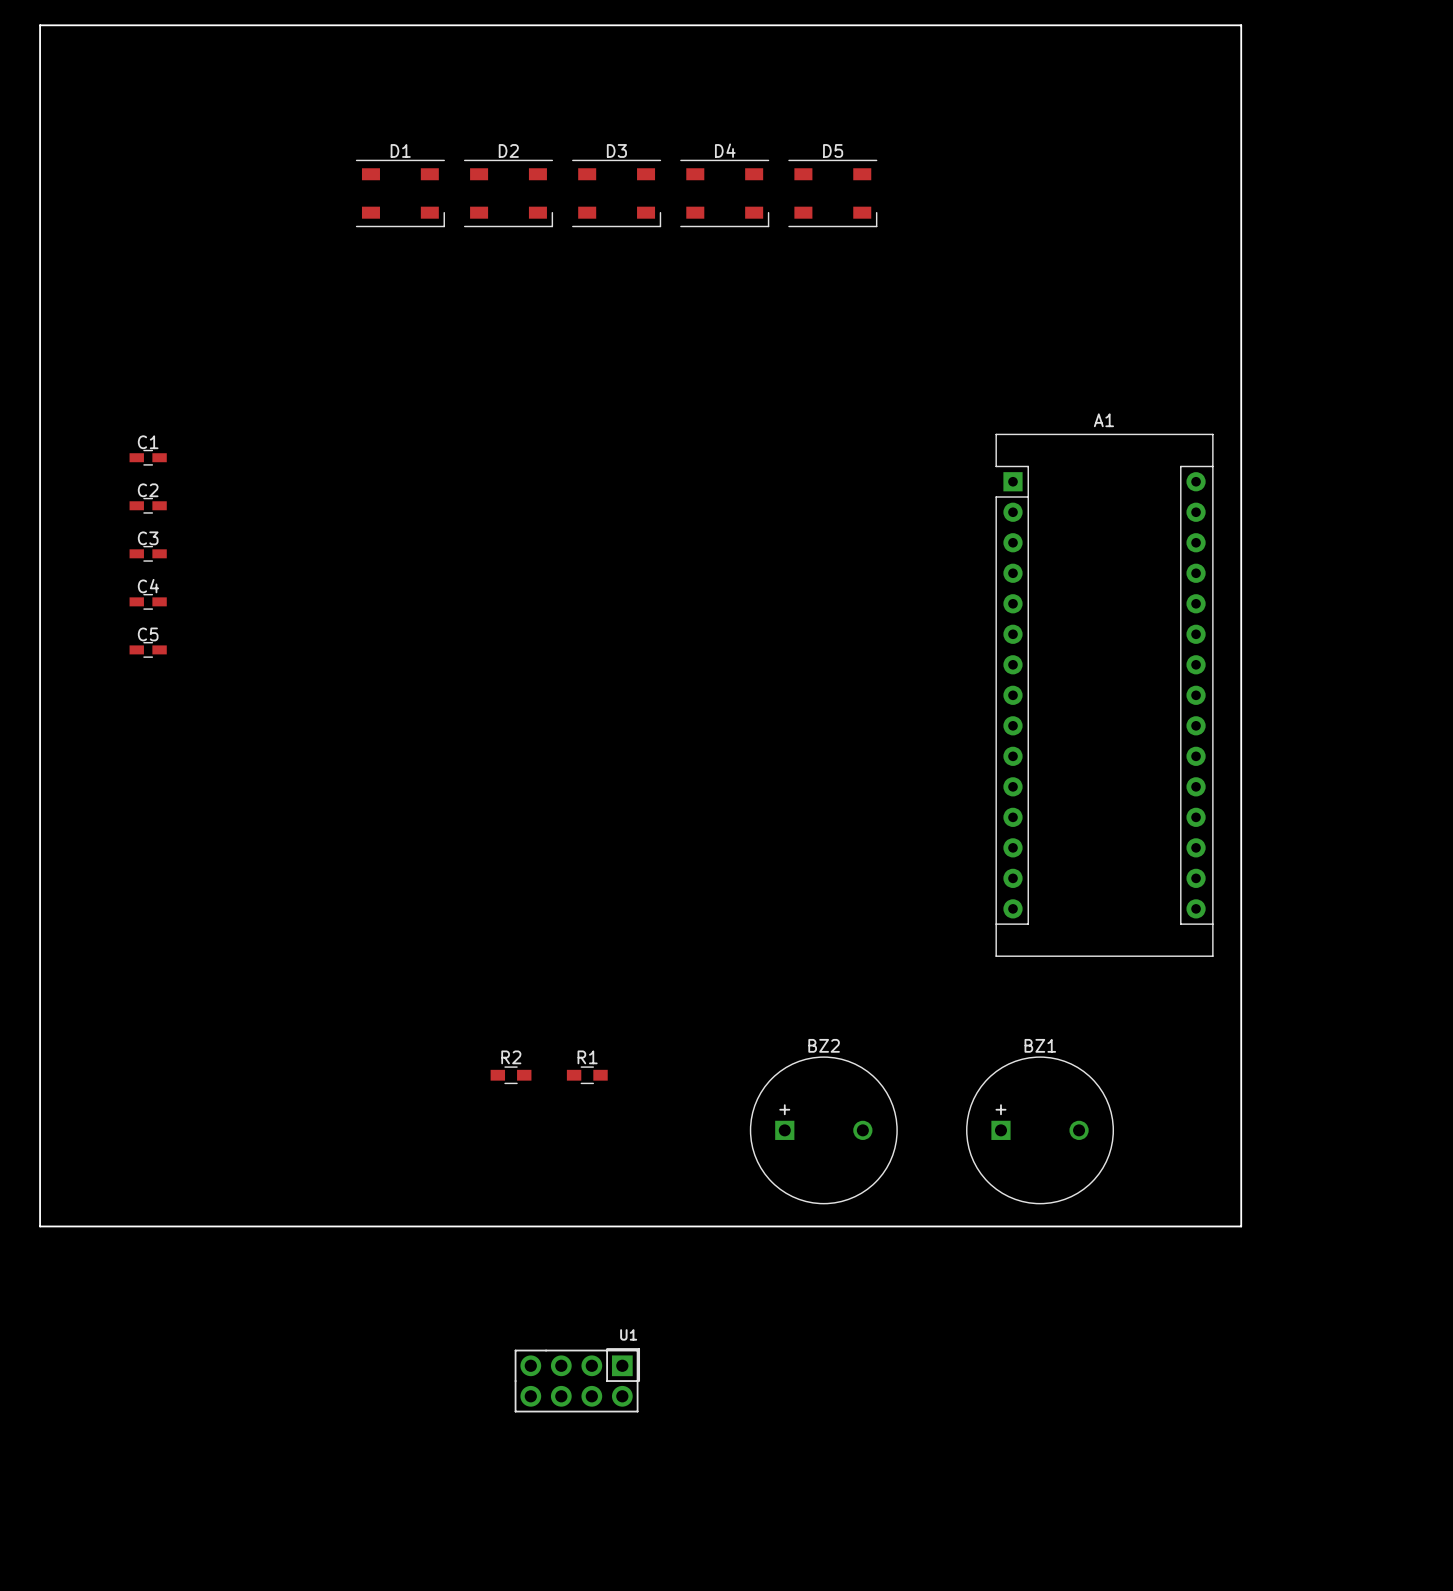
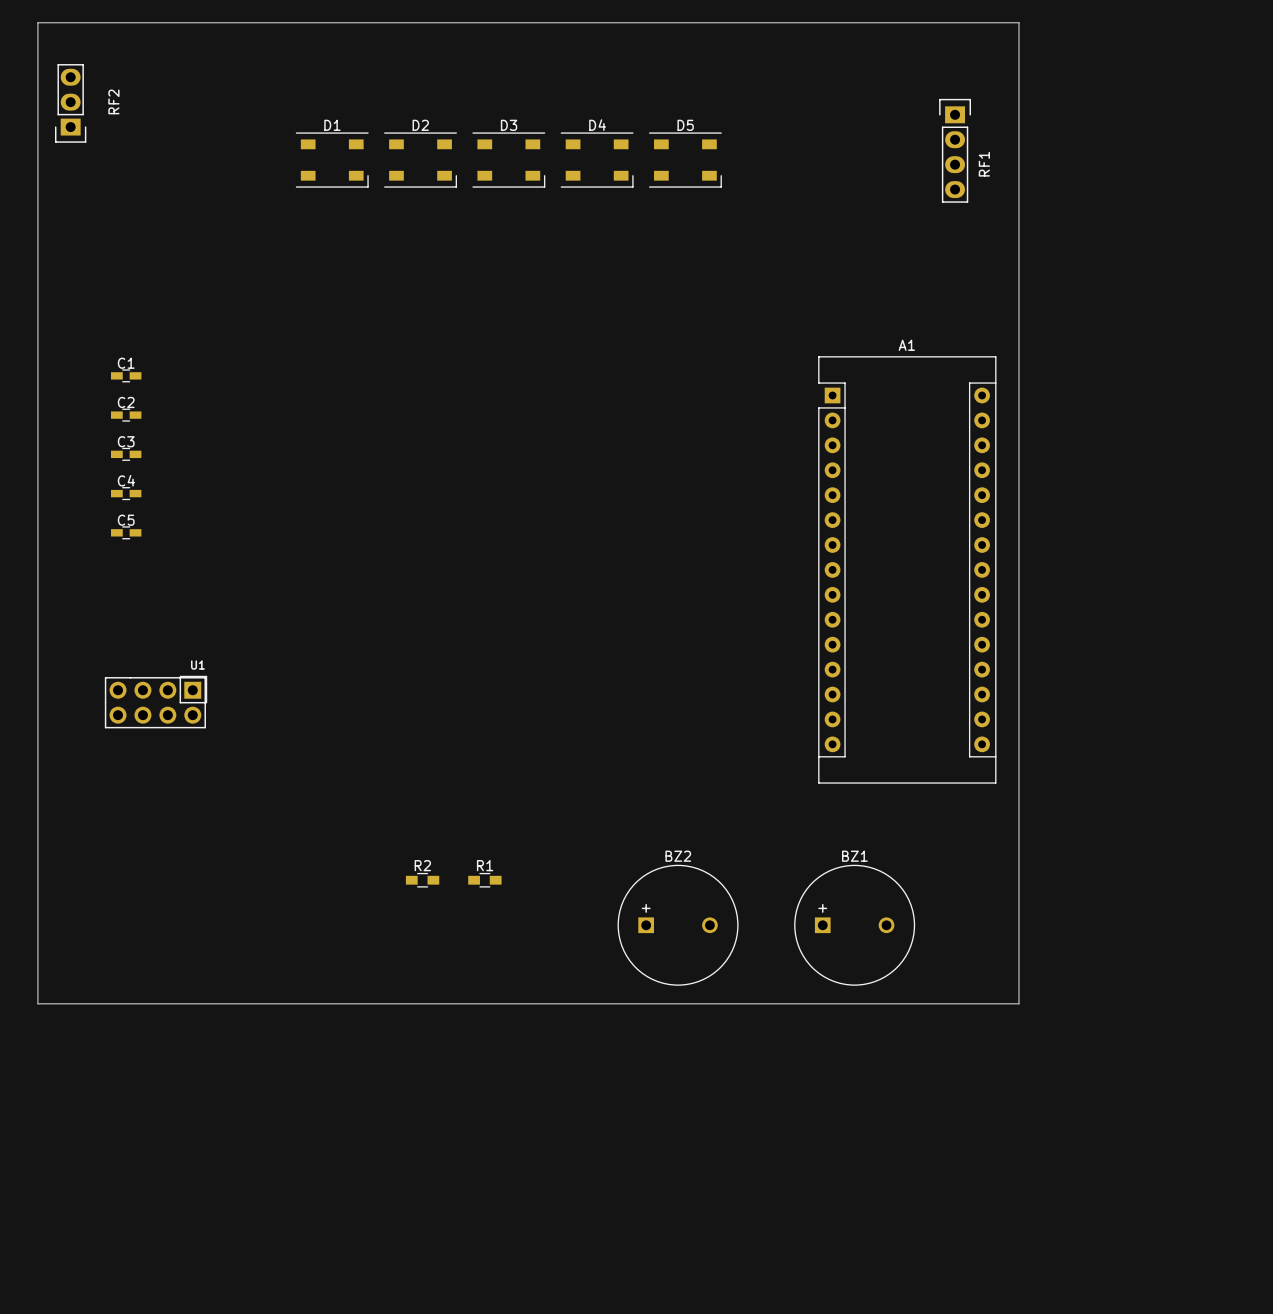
RF2: none -> (70, 103)
RF1: none -> (955, 150)
U1 position: (577, 1380) -> (156, 702)

